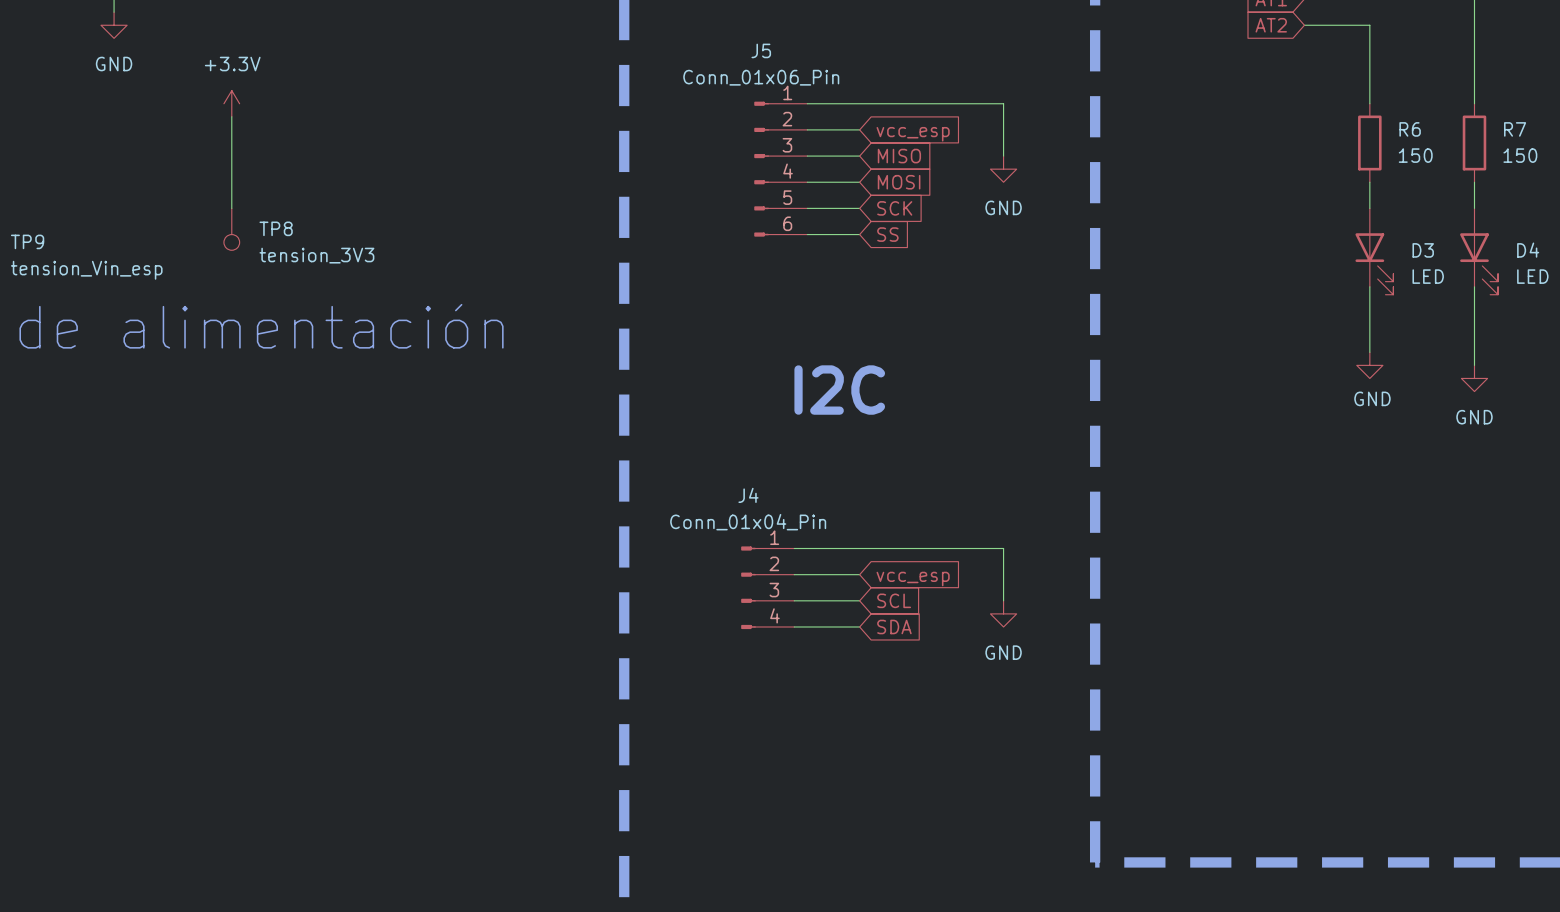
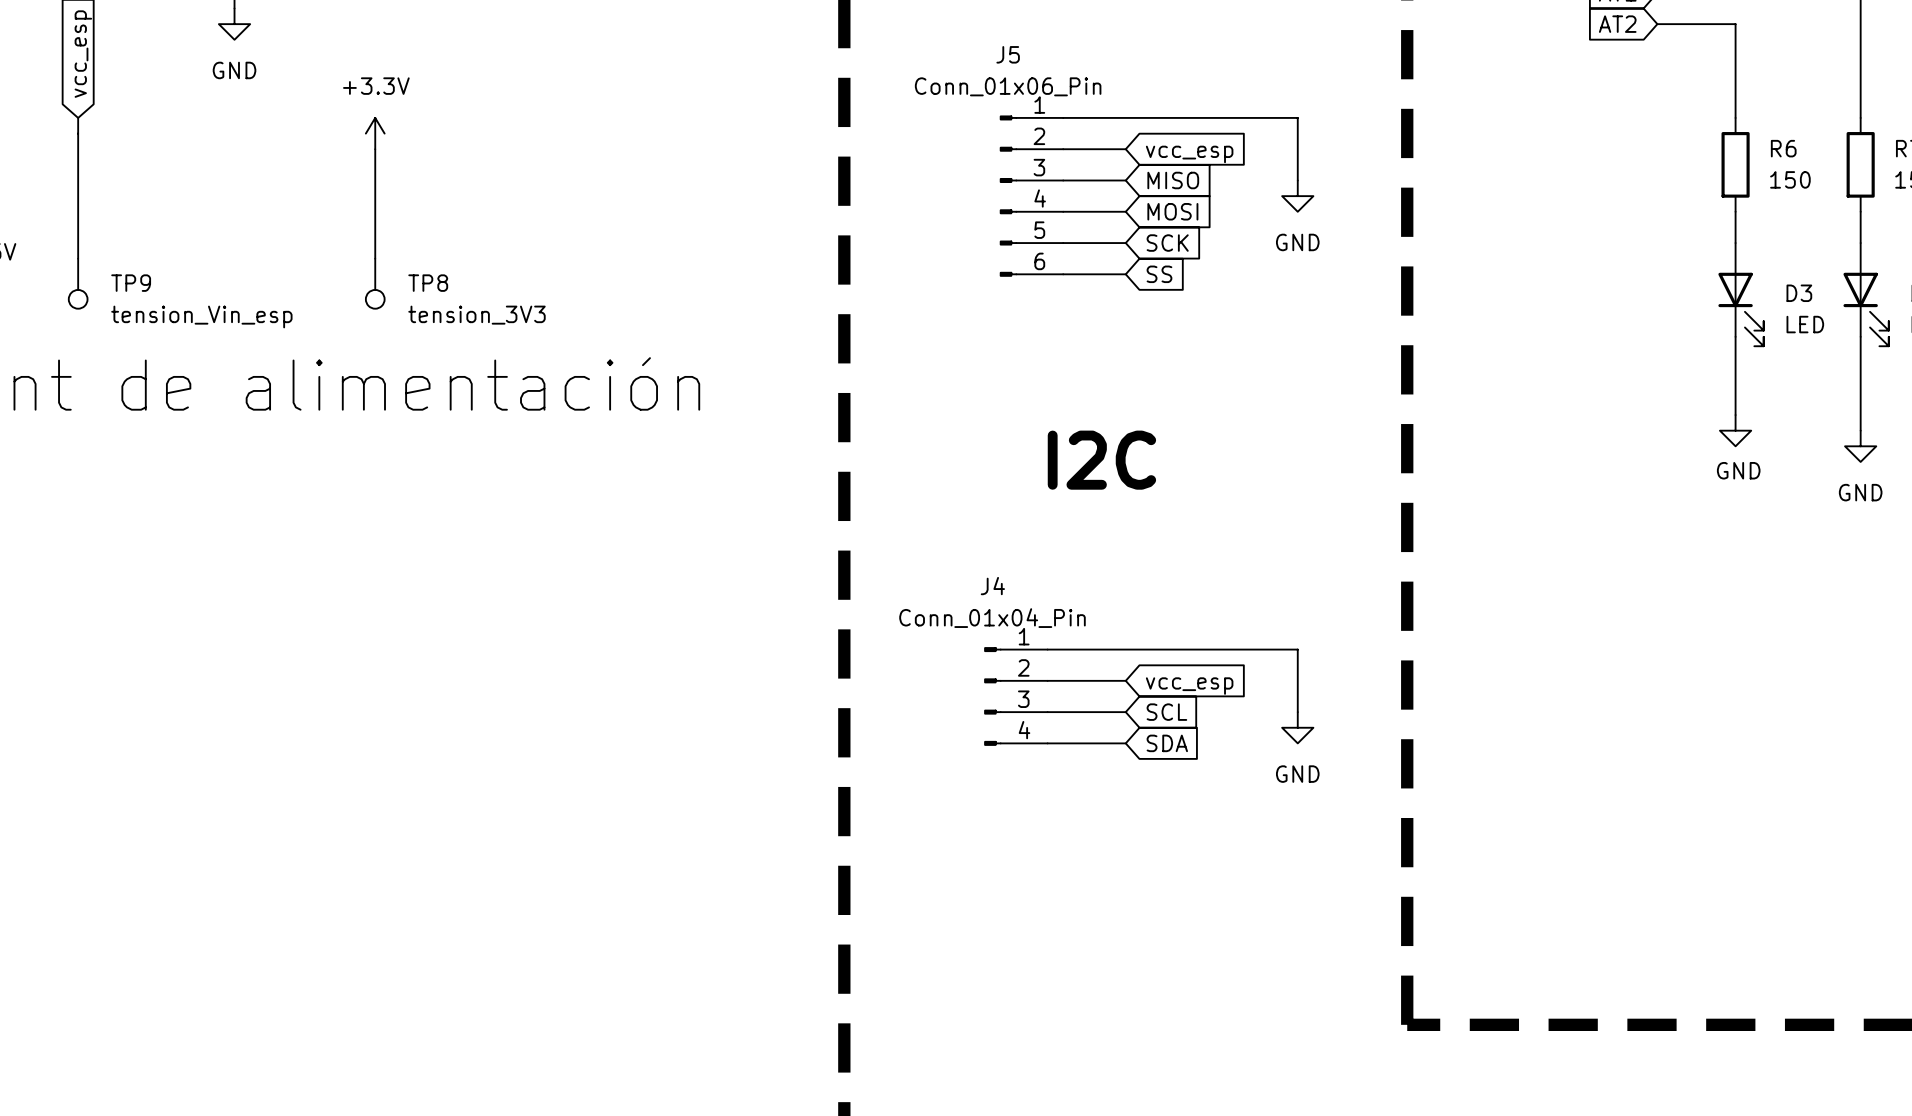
power symbol position: +3.3V (231, 103) -> +3.3V (375, 133)
TP8 position: (231, 229) -> (375, 283)

